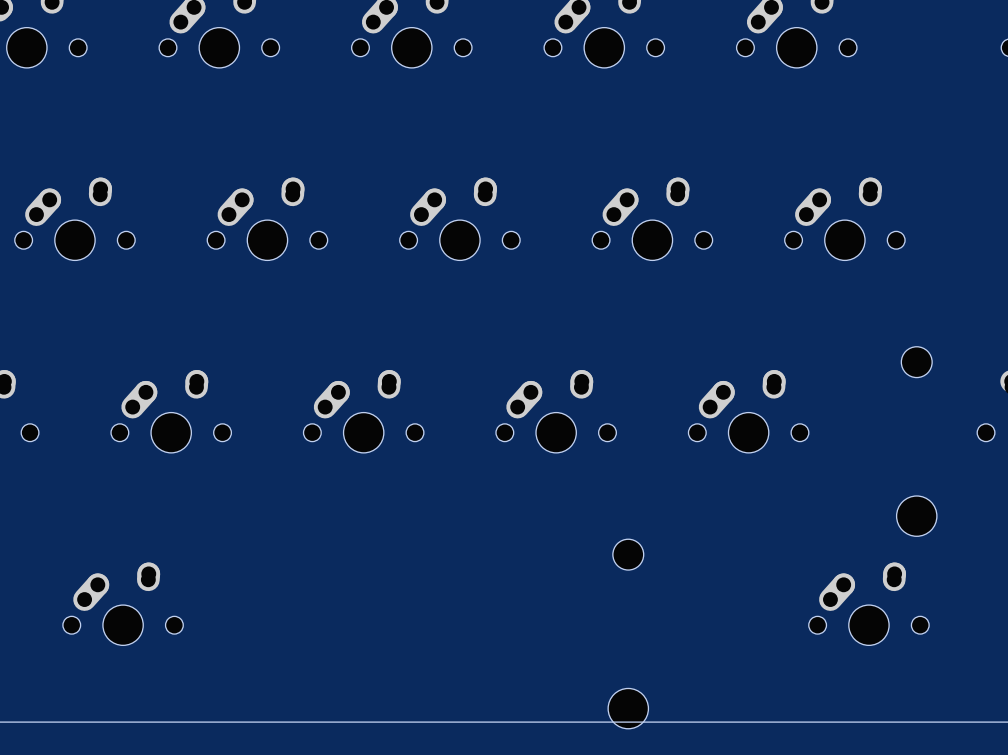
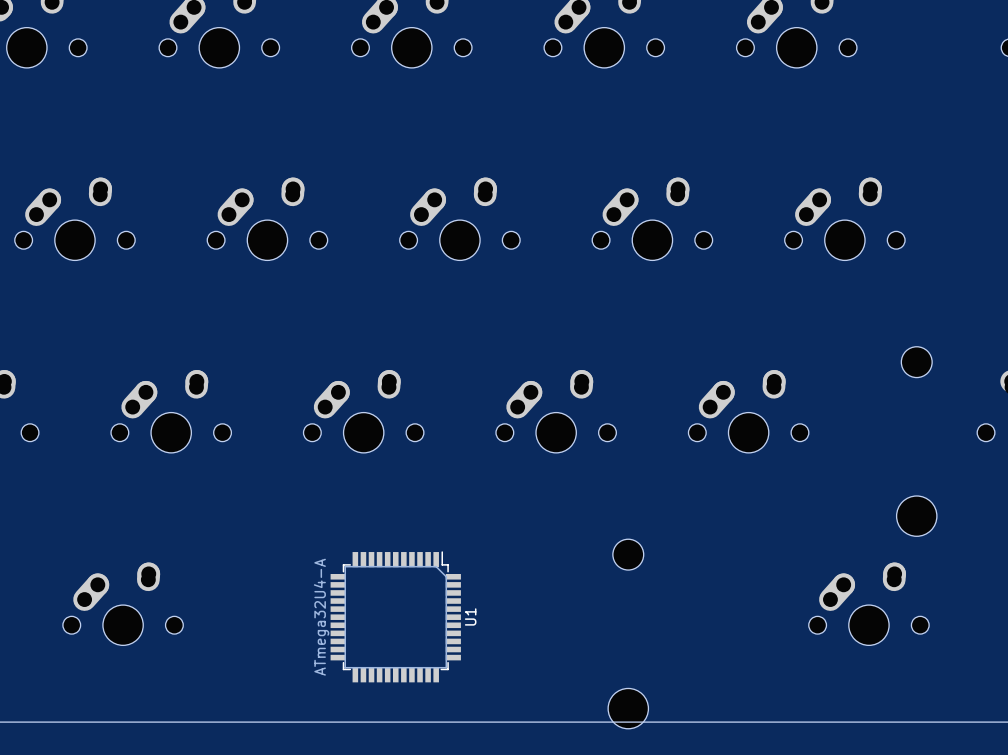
U1: none -> ATmega32U4-A (395, 616)

